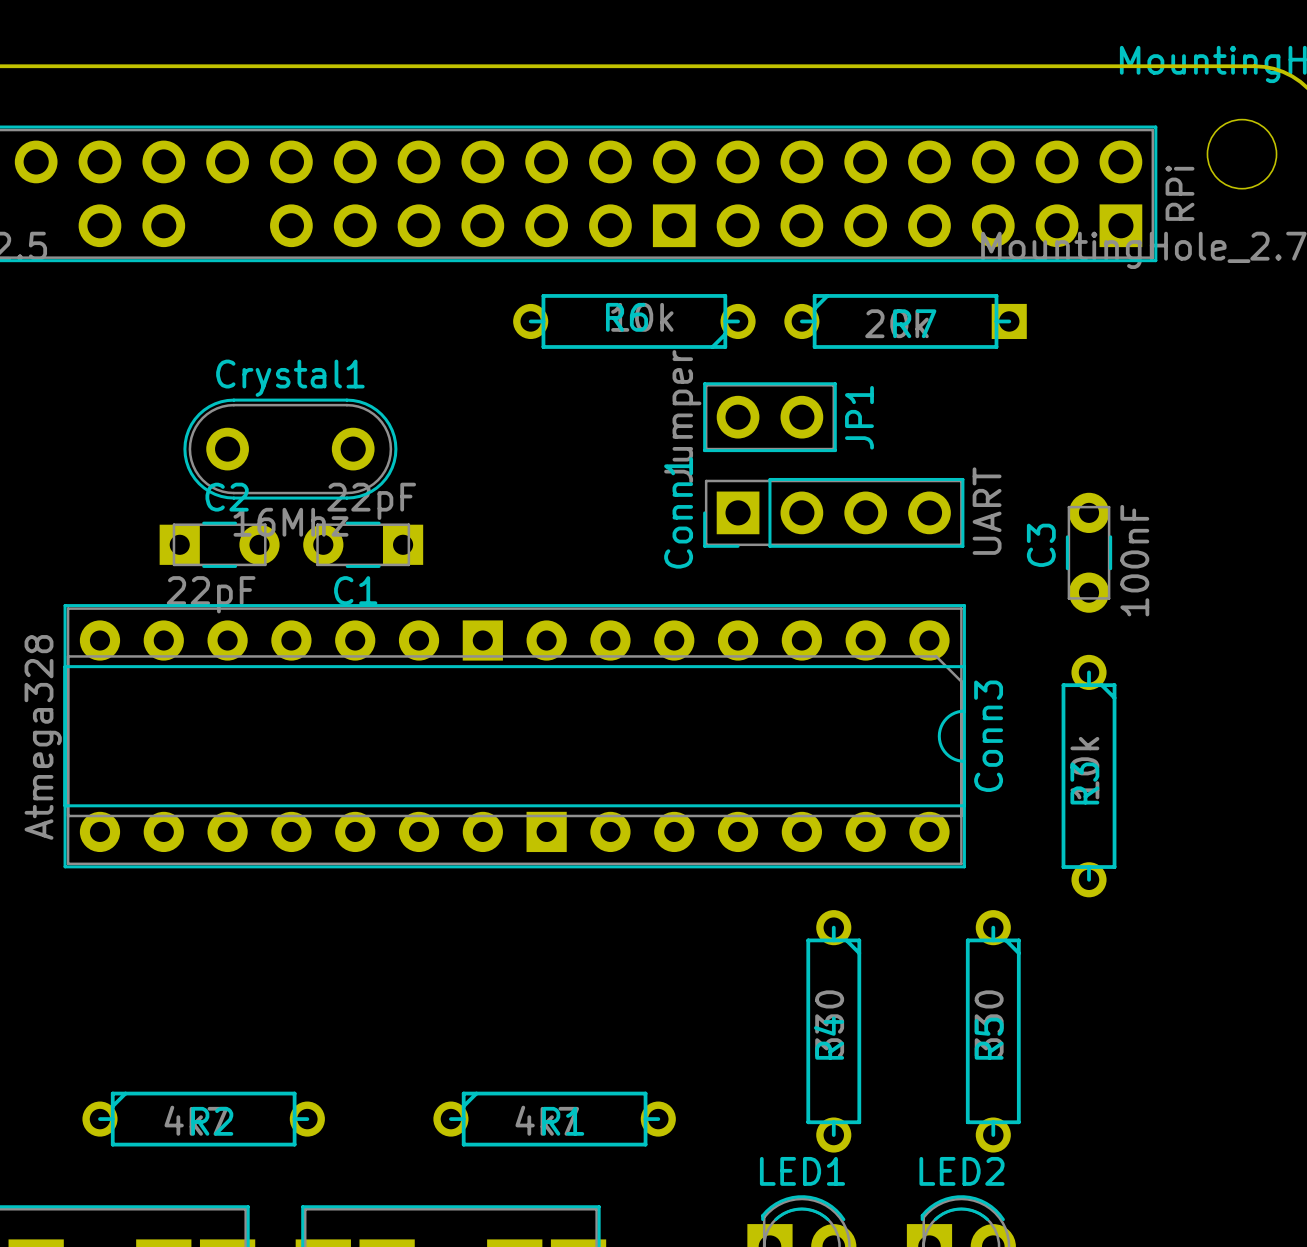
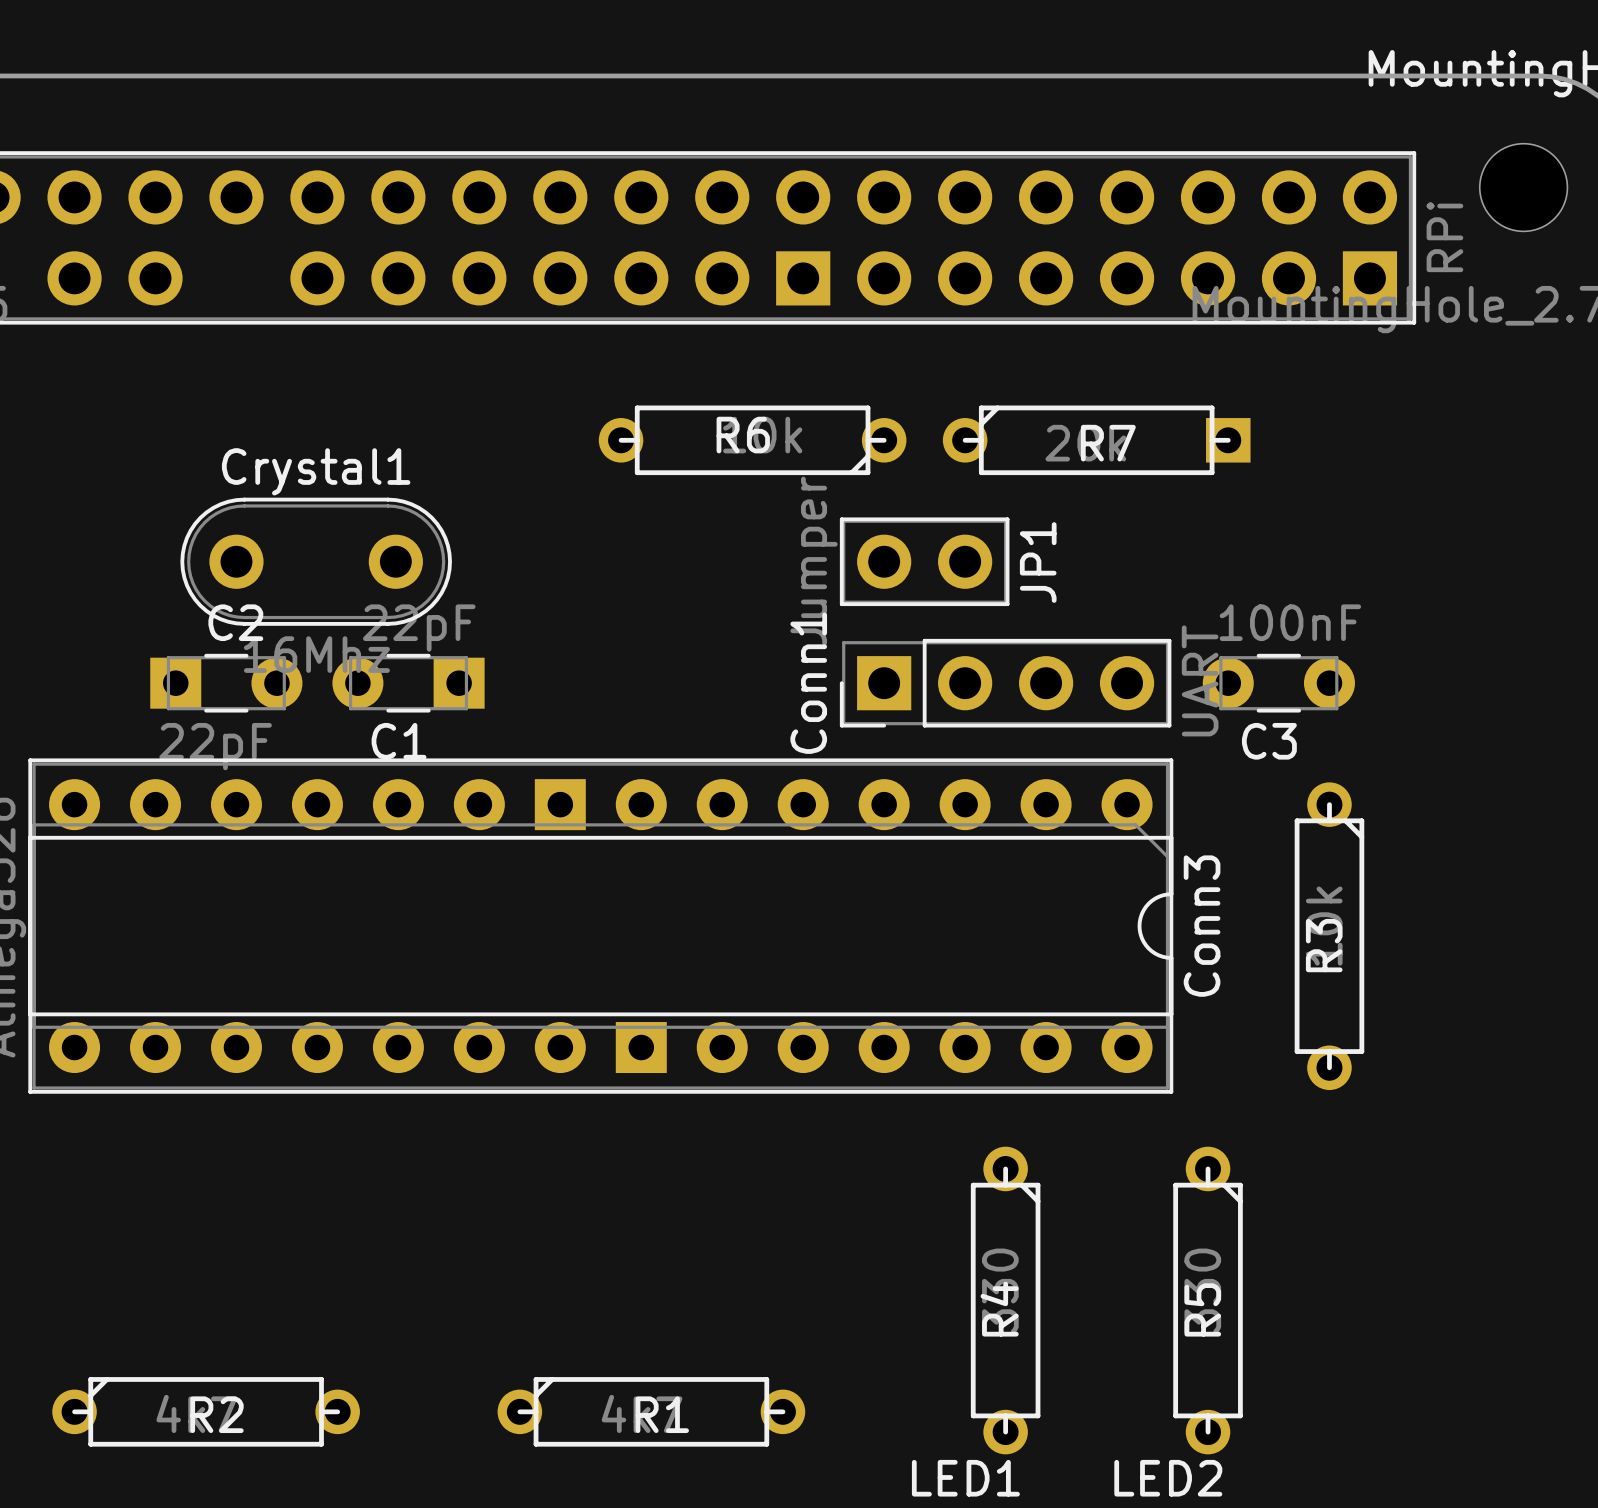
R6 position: (634, 321) -> (752, 440)
R7 position: (905, 321) -> (1096, 440)
JP1 position: (769, 417) -> (924, 561)
Conn1 position: (833, 512) -> (1005, 683)
C3 name position: C3 (1041, 545) -> C3 (1269, 741)
C3 rotation: 0° (1089, 552) -> 90° clockwise (1278, 683)
C3 value position: 100nF (1134, 560) -> 100nF (1290, 622)
R3 position: (1089, 776) -> (1329, 936)

